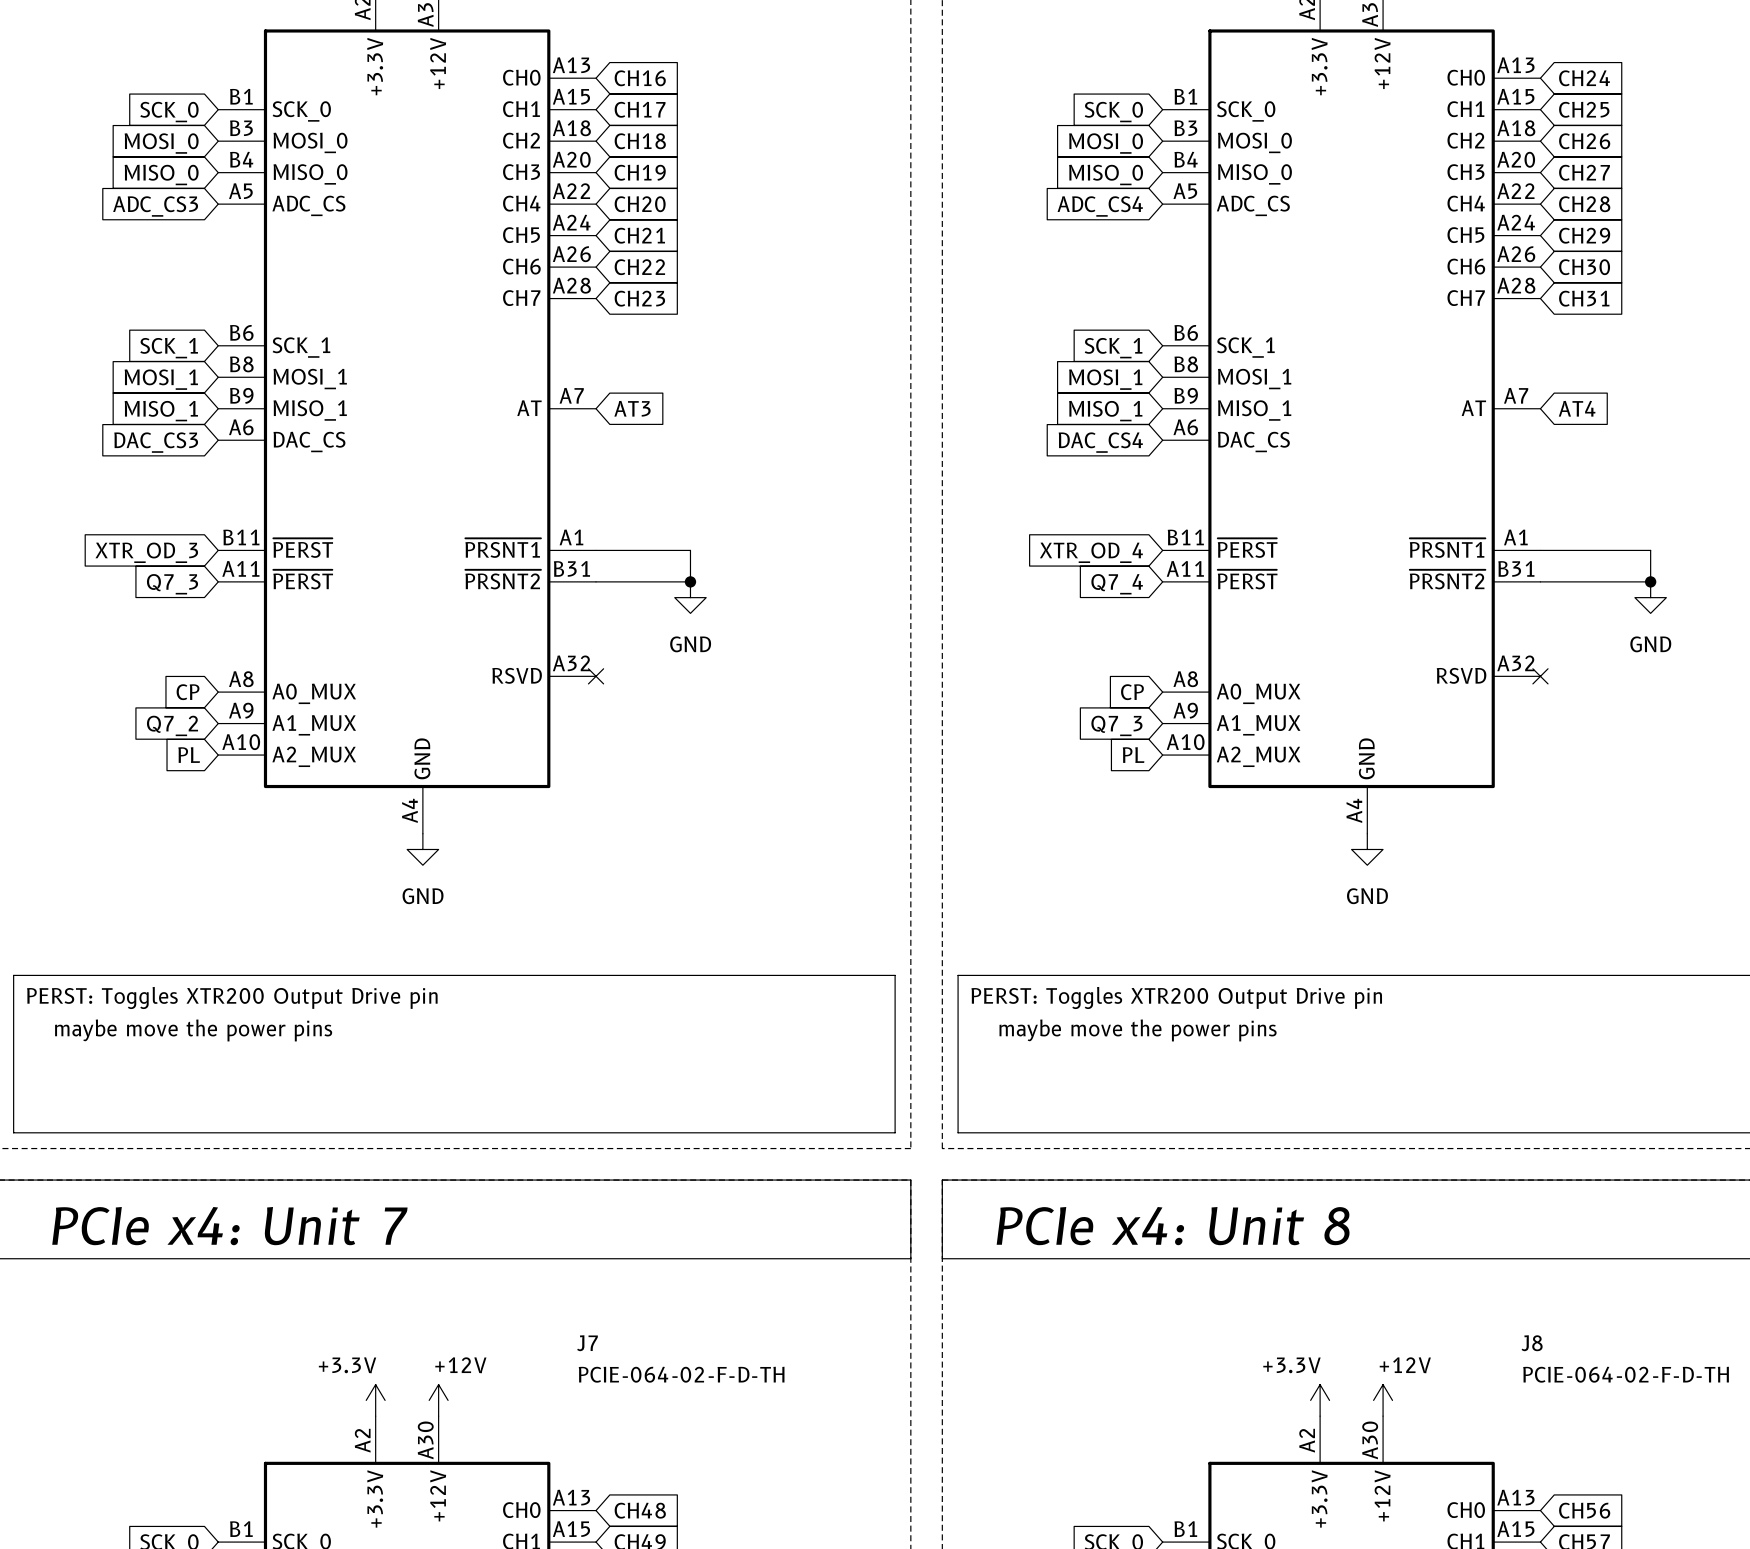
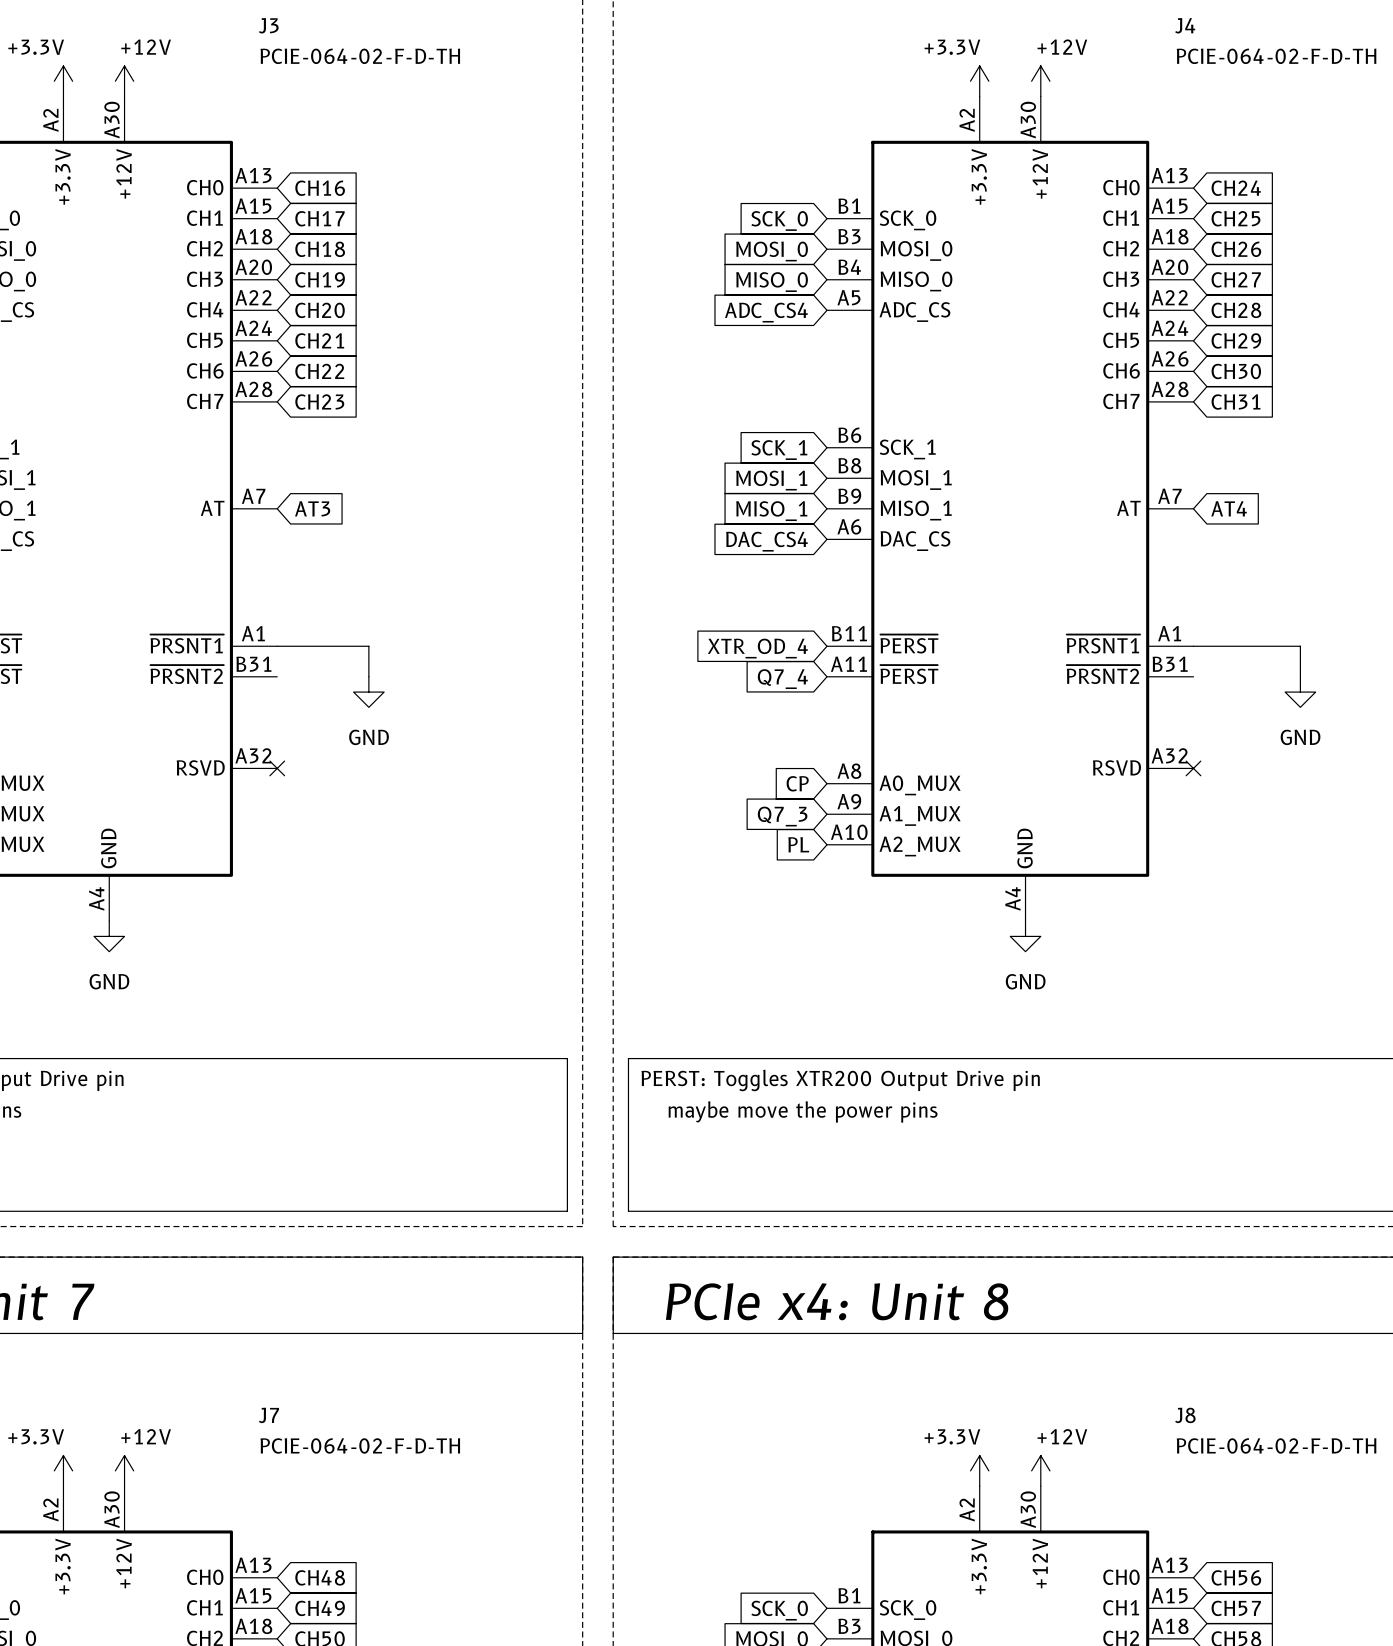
wire: (596, 581) (690, 581) -> none
junction: (690, 581) -> none
wire: (1540, 581) (1650, 581) -> none
junction: (1650, 581) -> none

